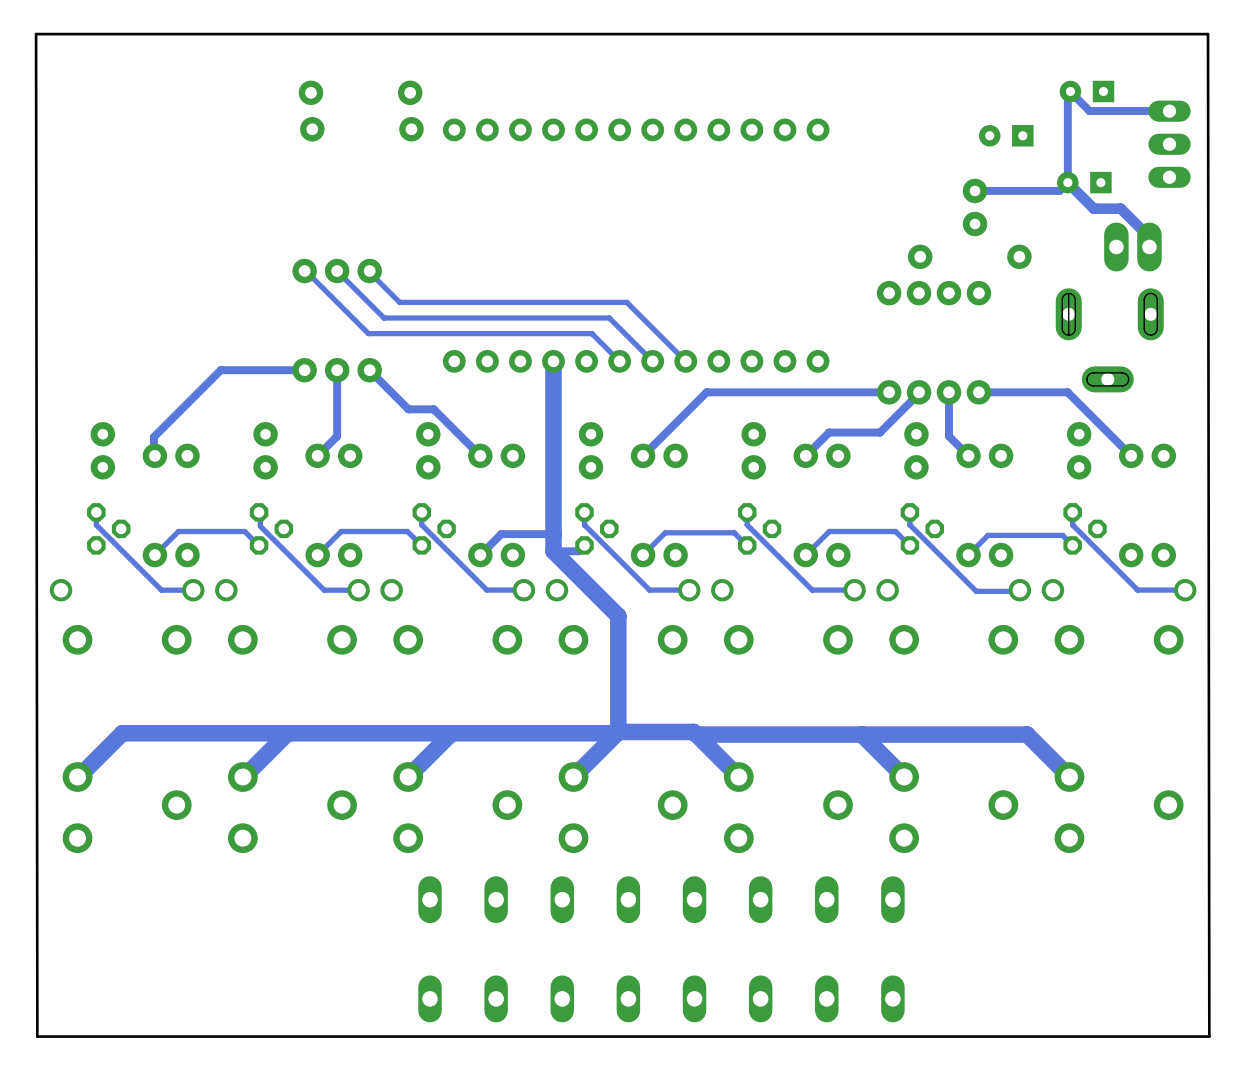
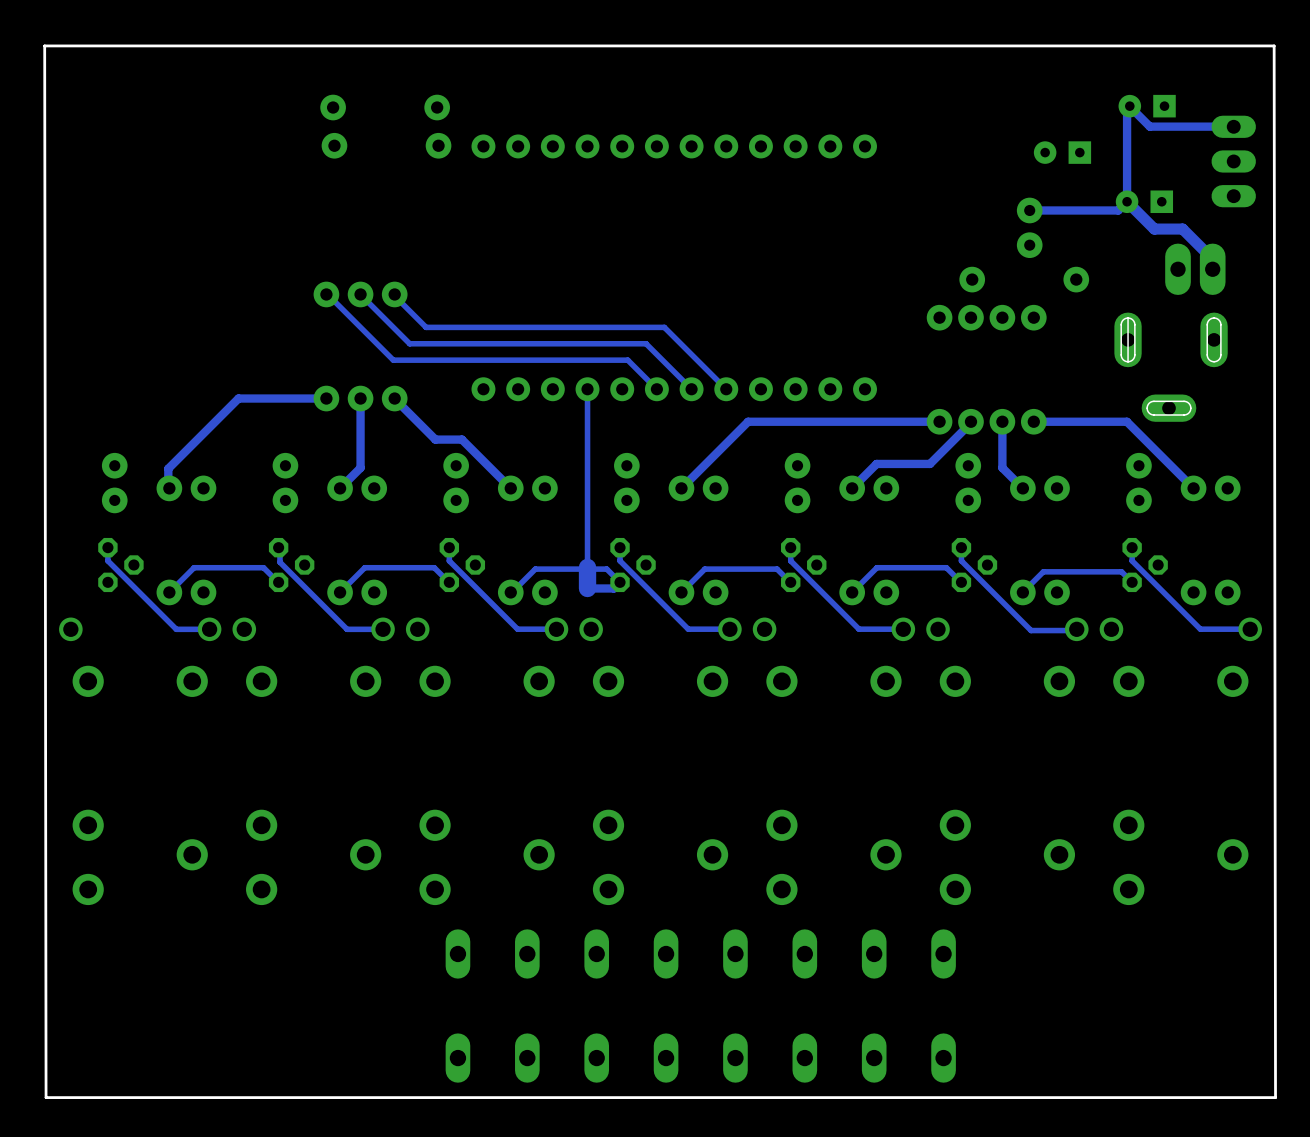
track width: thick (553, 361) (553, 531) -> thin (587, 389) (587, 567)
track: (553, 534) (501, 534) (480, 555) -> (620, 582) (606, 569) (535, 569) (510, 592)
track: (553, 551) (618, 616) (618, 732) (573, 777) -> none
track: (618, 730) (693, 731) (738, 776) -> none
track: (287, 733) (242, 777) -> none
track: (451, 733) (408, 776) -> none
track: (617, 733) (122, 733) (77, 777) -> none
track: (696, 734) (1027, 734) (1069, 776) -> none
track: (861, 734) (904, 776) -> none

